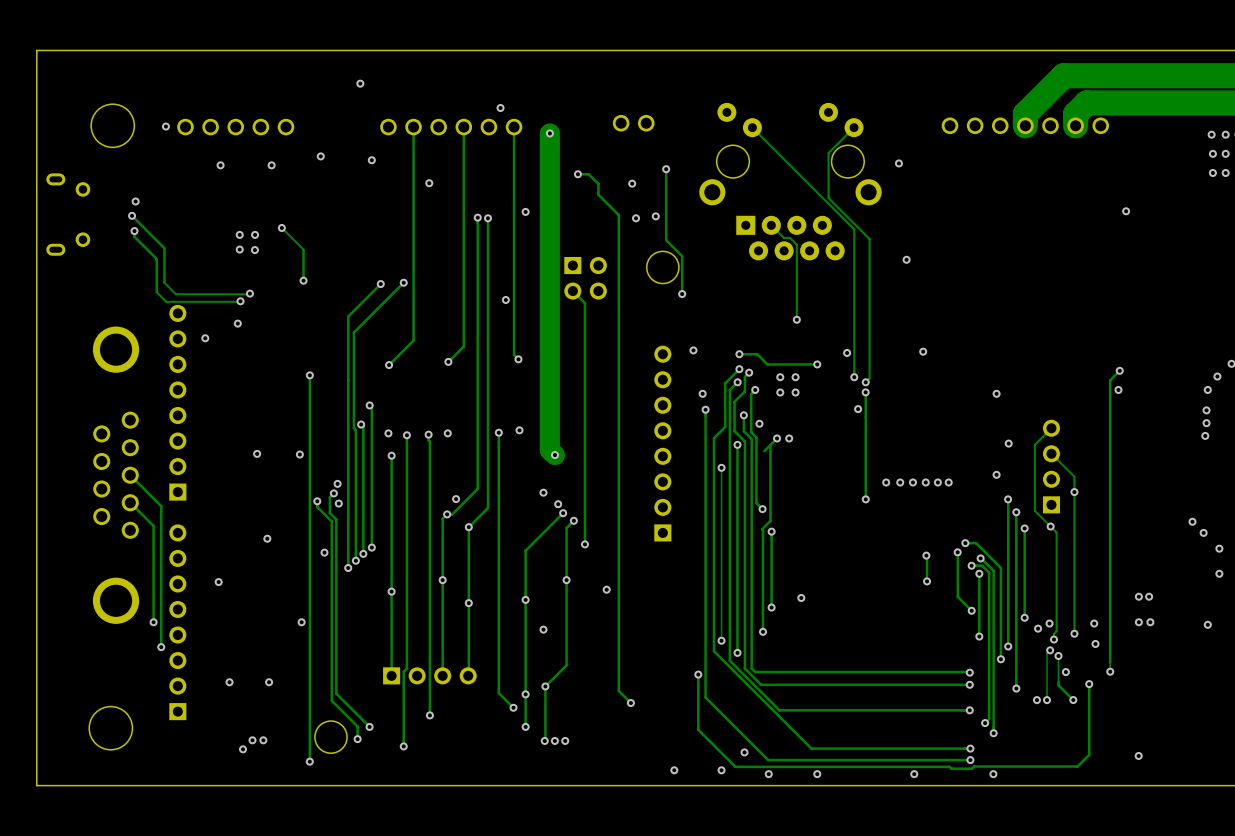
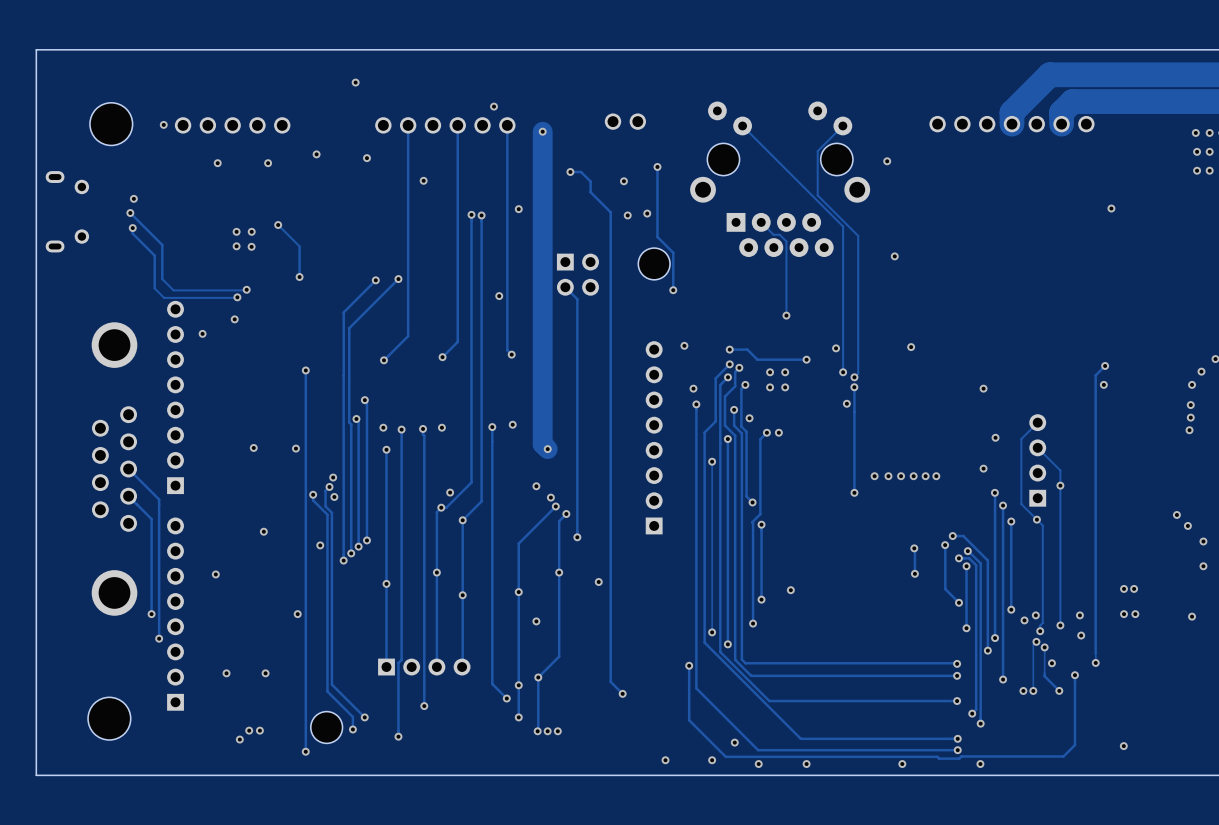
track: (770, 445) (764, 451) -> none

